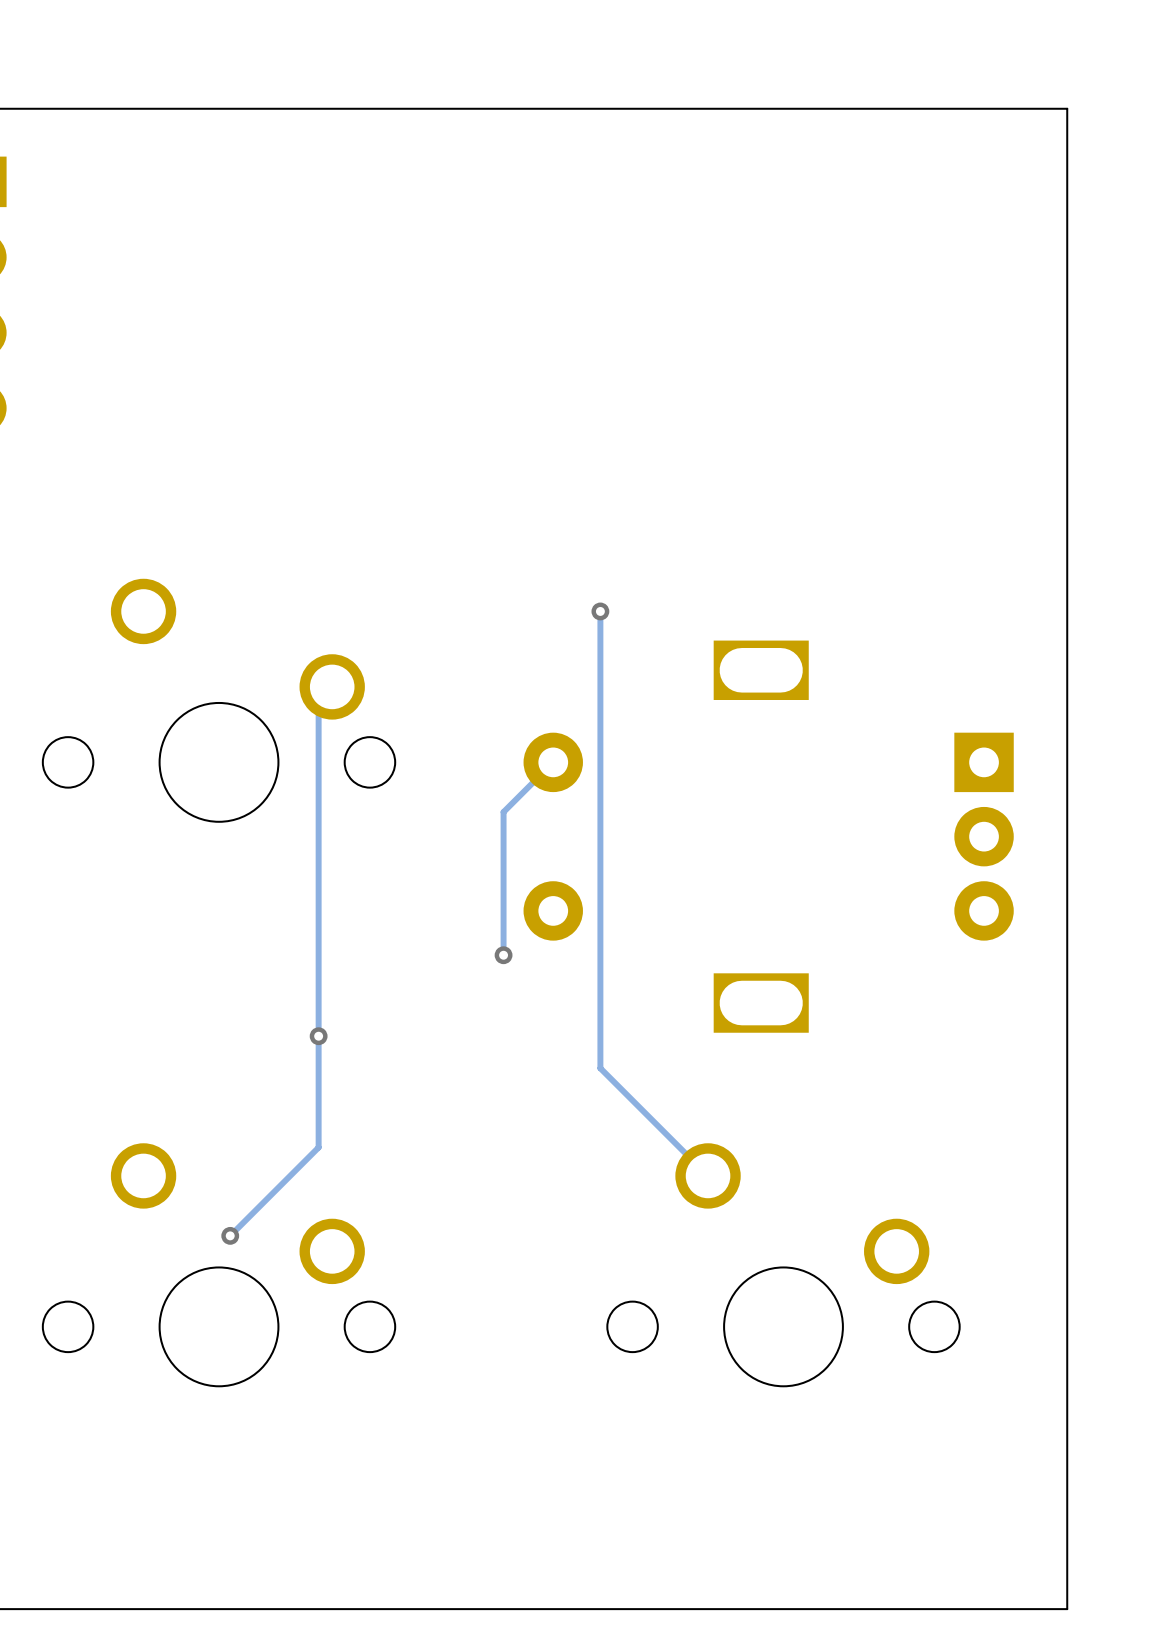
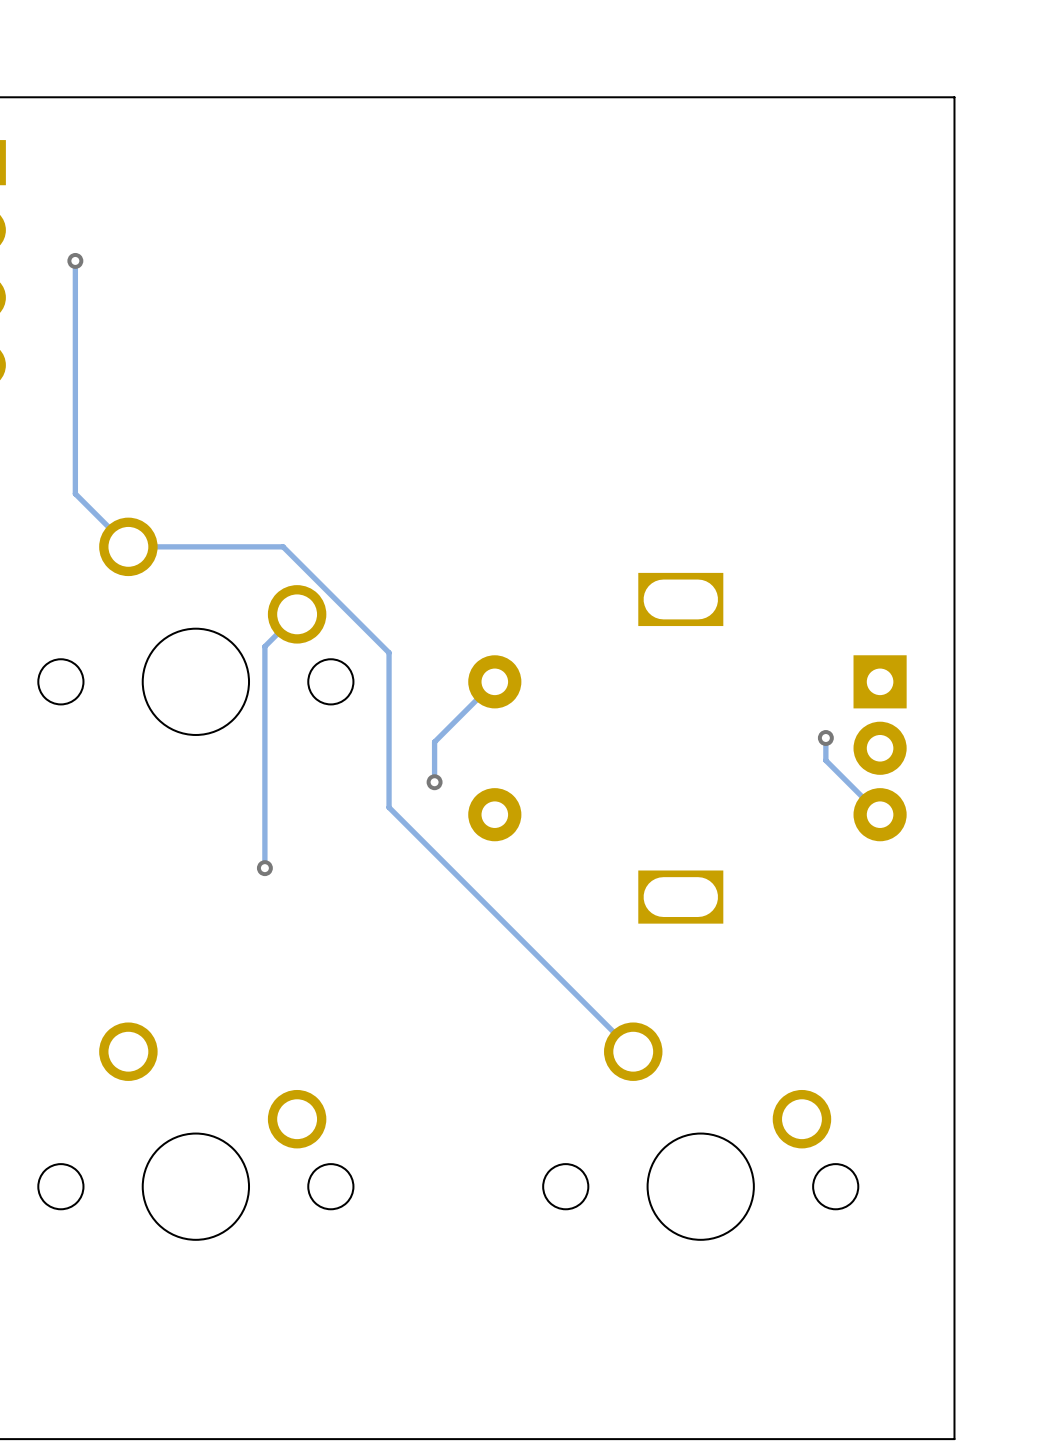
via: none -> (75, 260)
track: (600, 611) (600, 1068) -> (75, 260) (75, 493) (128, 546) (283, 546) (389, 652) (389, 807) (536, 955)
via: (600, 611) -> none
track: (318, 700) (318, 1147) (230, 1235) -> (284, 626) (264, 646) (264, 868)
track: (503, 812) (503, 955) -> (450, 726) (434, 742) (434, 782)
track: none -> (825, 737) (825, 760) (880, 814)
via: none -> (825, 737)
via position: (503, 955) -> (434, 782)
via position: (318, 1036) -> (264, 868)
via: (230, 1235) -> none

